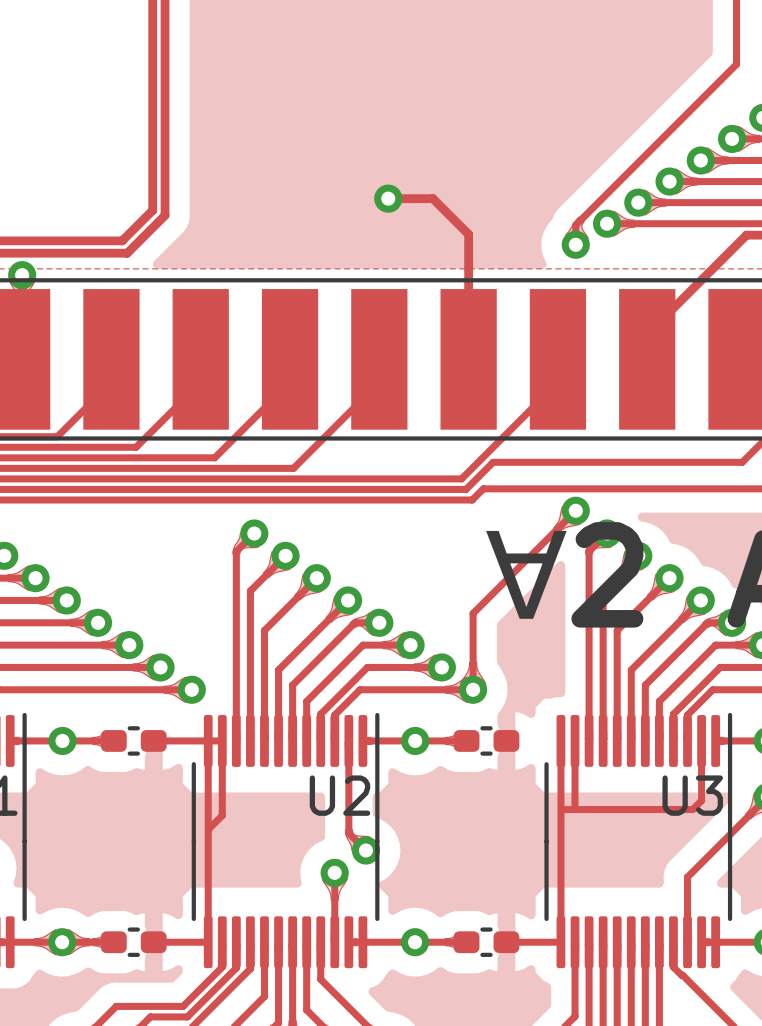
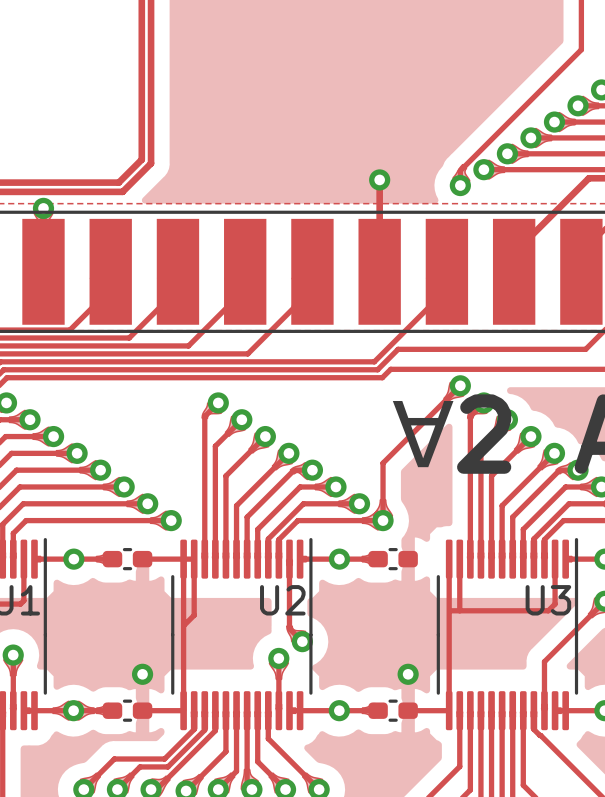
track: (388, 198) (432, 198) (468, 234) (468, 237) -> none
via position: (388, 198) -> (379, 179)
via: none -> (142, 674)
via: none -> (408, 674)

